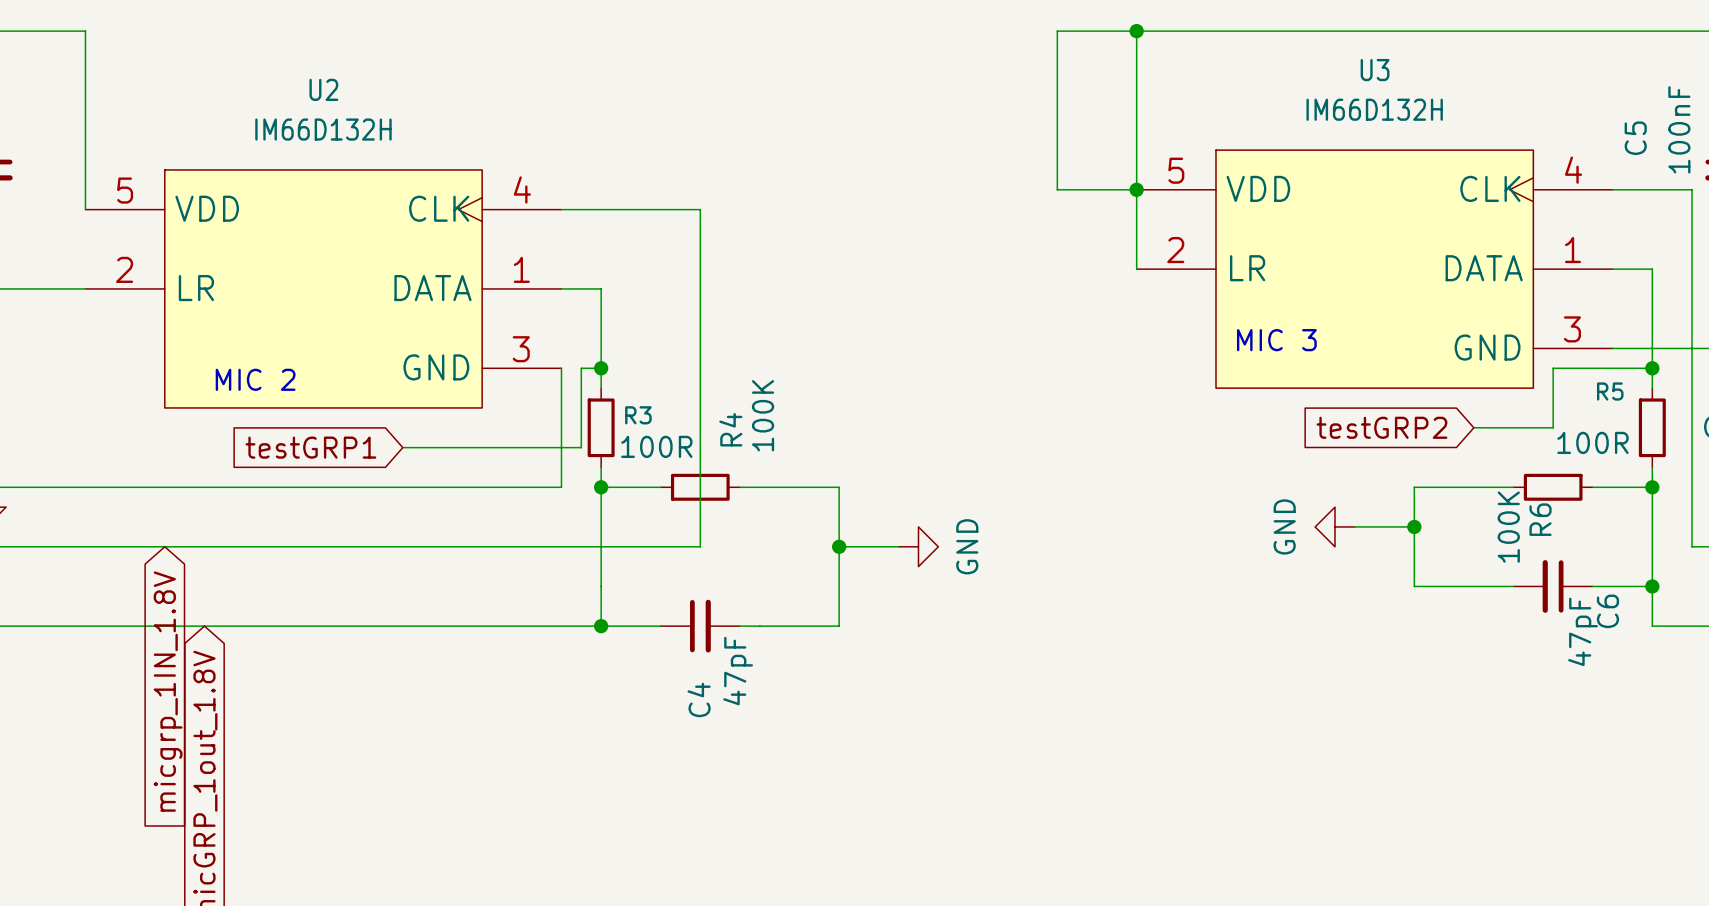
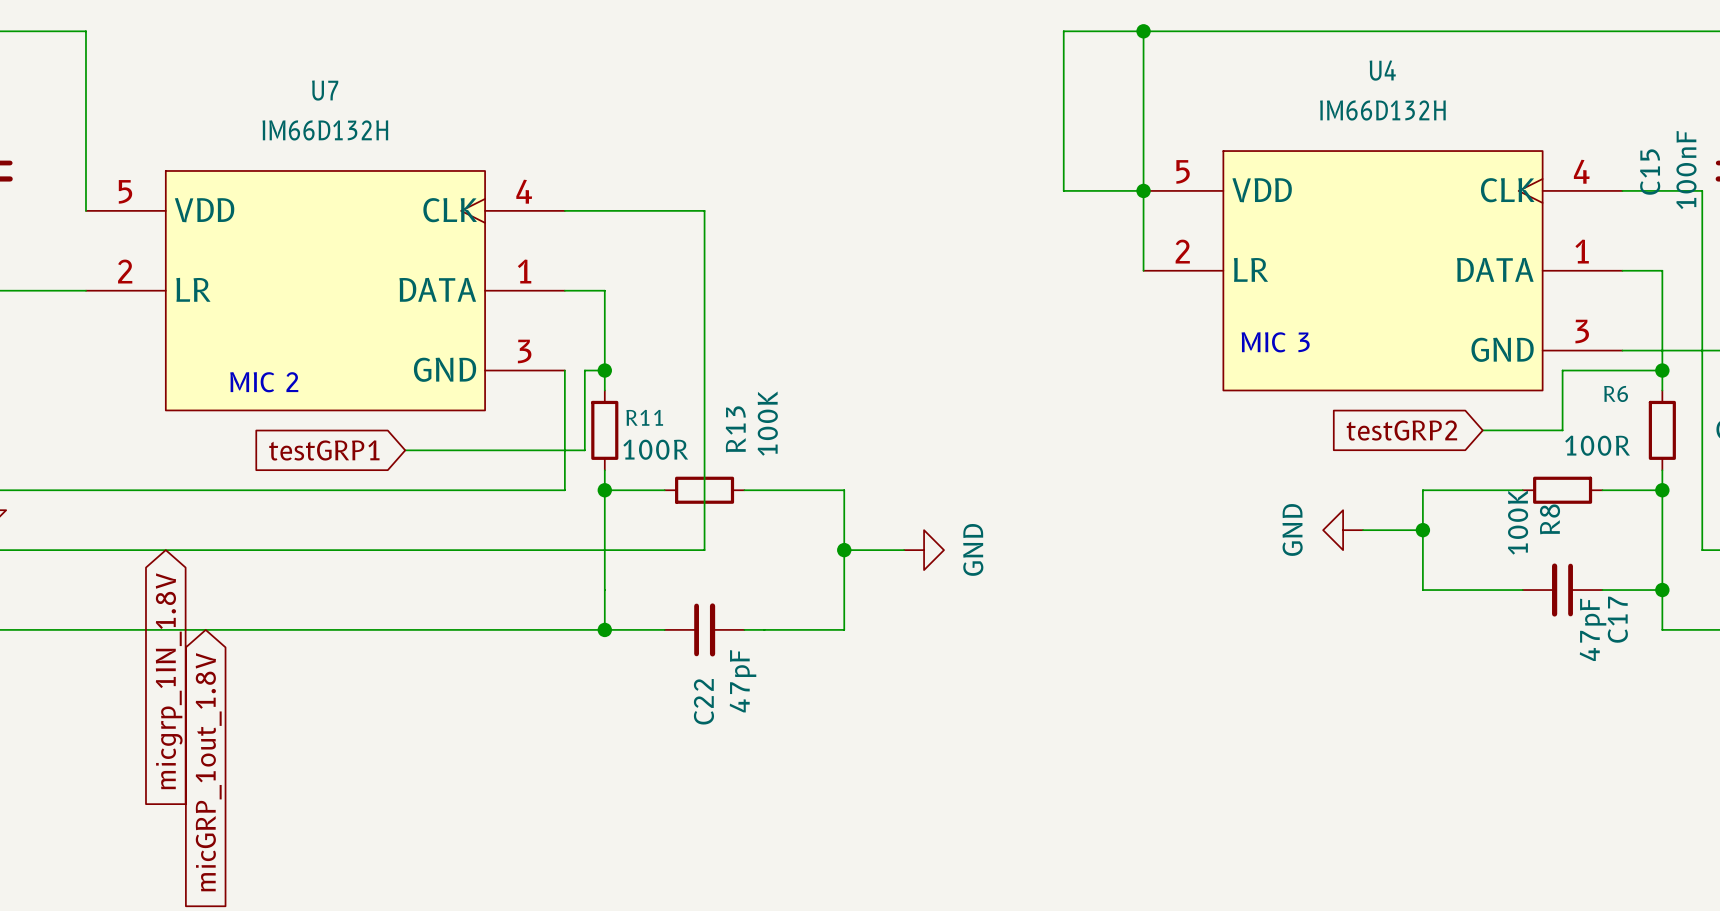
U3 name: U3 (1375, 70) -> U4 (1382, 70)
U2 name: U2 (323, 89) -> U7 (325, 90)
C5 value position: 100nF (1679, 129) -> 100nF (1686, 170)
C5 name: C5 (1635, 138) -> C15 (1650, 172)
R5 name: R5 (1610, 391) -> R6 (1616, 393)
R3 name: R3 (638, 415) -> R11 (644, 417)
R4 name: R4 (730, 429) -> R13 (735, 429)
R6 name: R6 (1540, 519) -> R8 (1550, 519)
C6 name: C6 (1607, 611) -> C17 (1617, 619)
C4 name: C4 (699, 699) -> C22 (703, 701)

